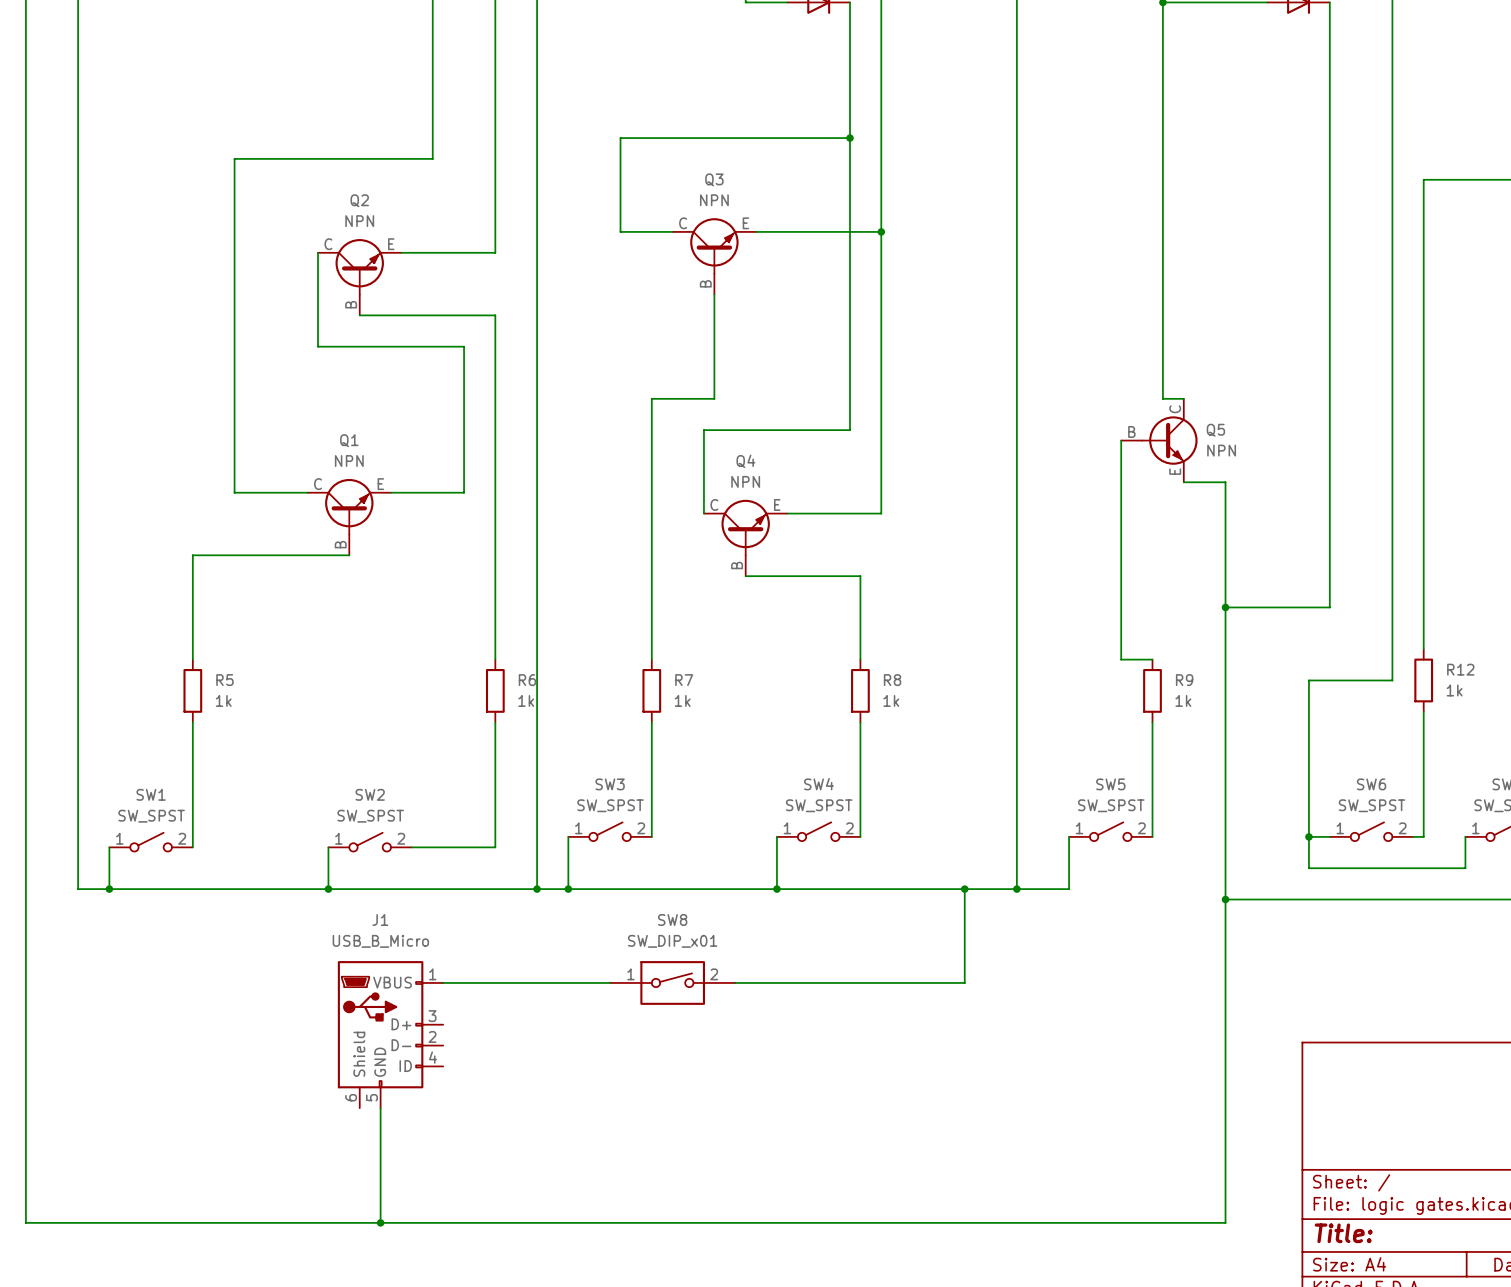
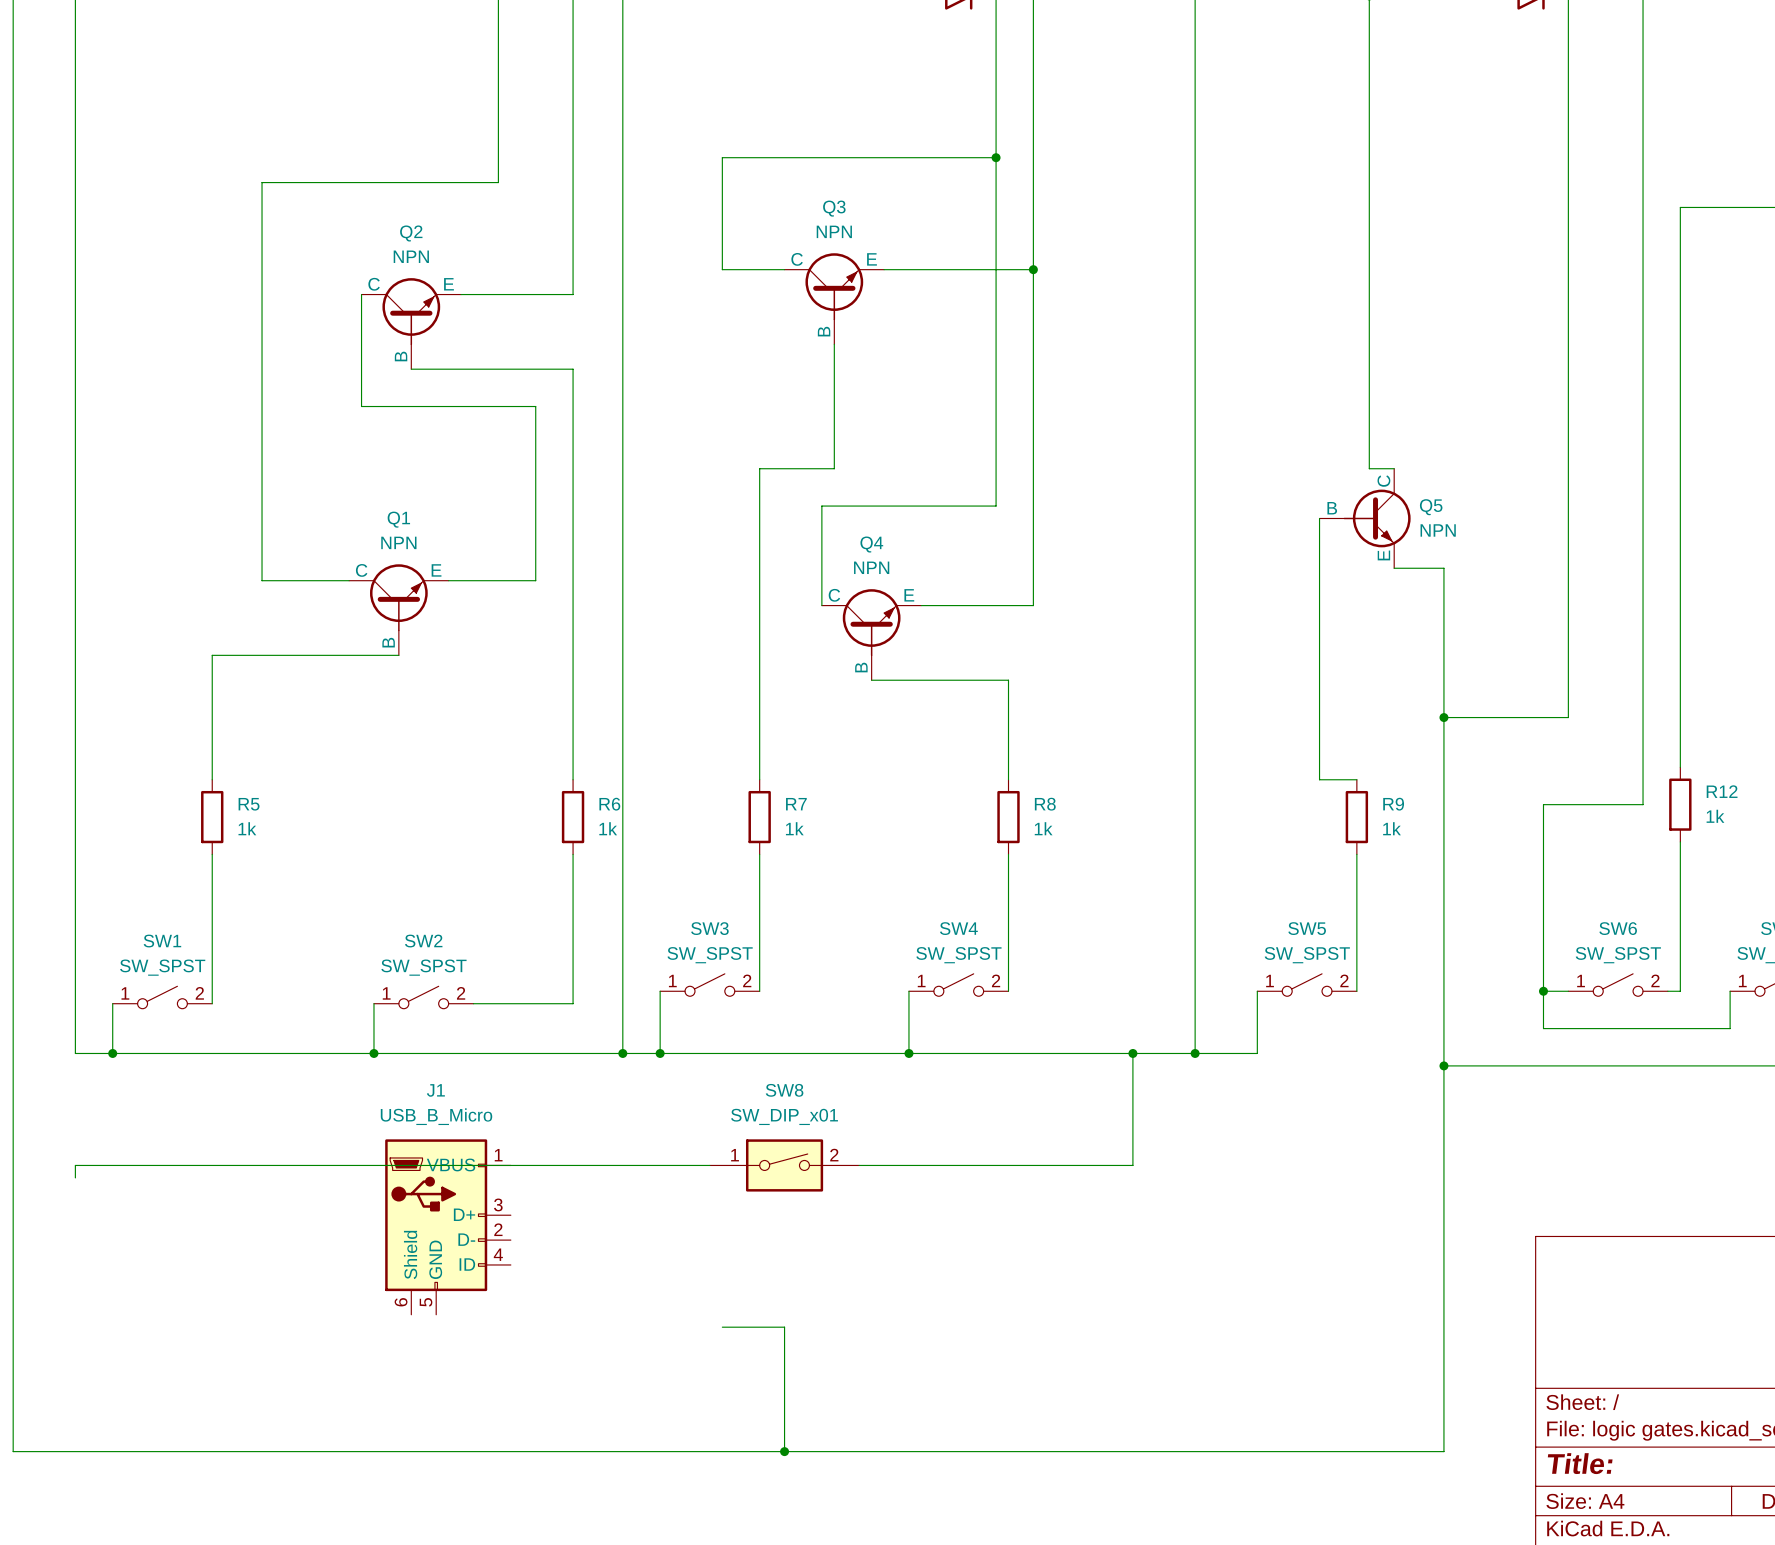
wire: none -> (510, 1165) (75, 1165) (75, 1177)
wire: (380, 1108) (380, 1222) -> none
wire: none -> (722, 1327) (784, 1327) (784, 1451)
junction: (380, 1222) -> none
junction: none -> (784, 1451)

